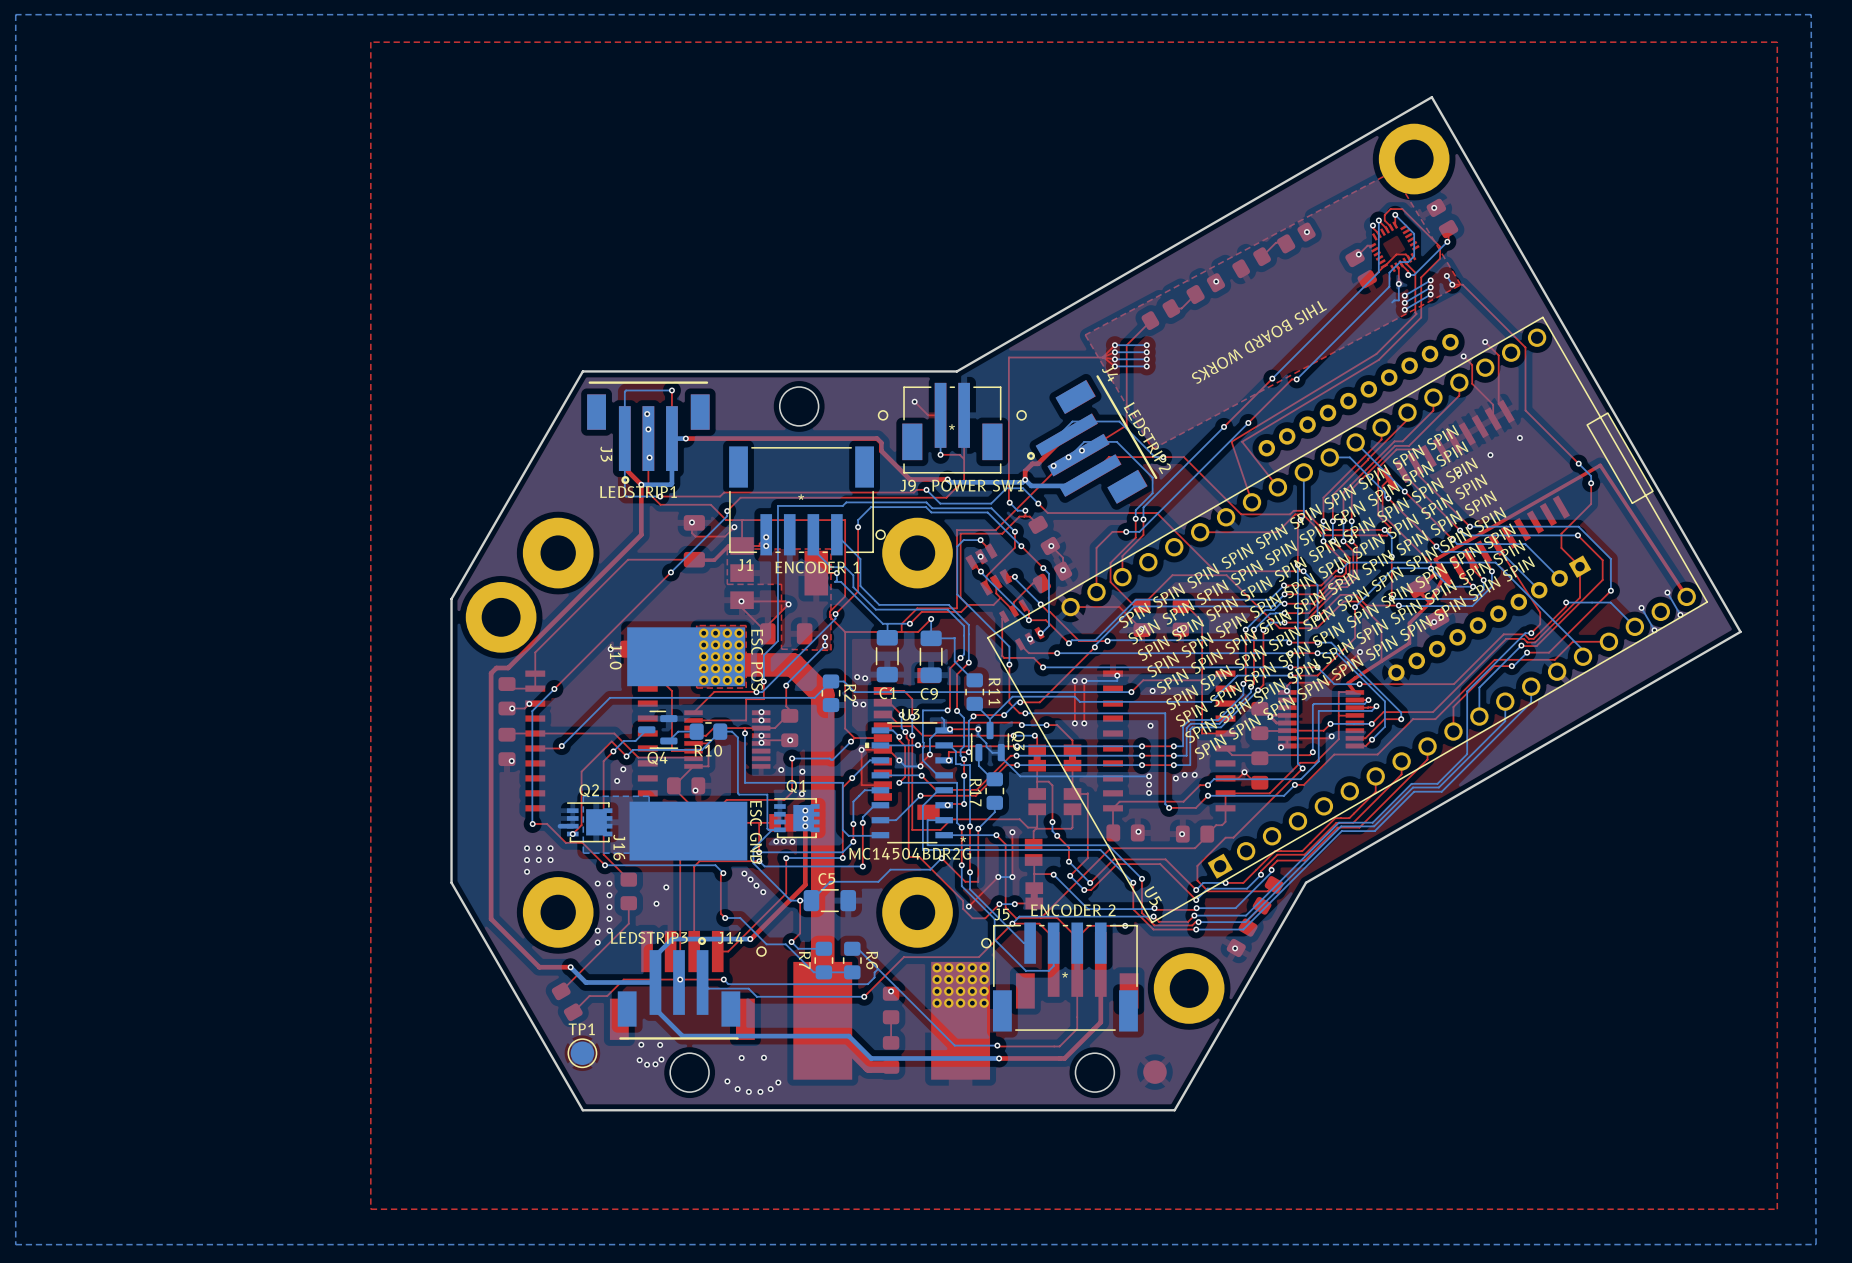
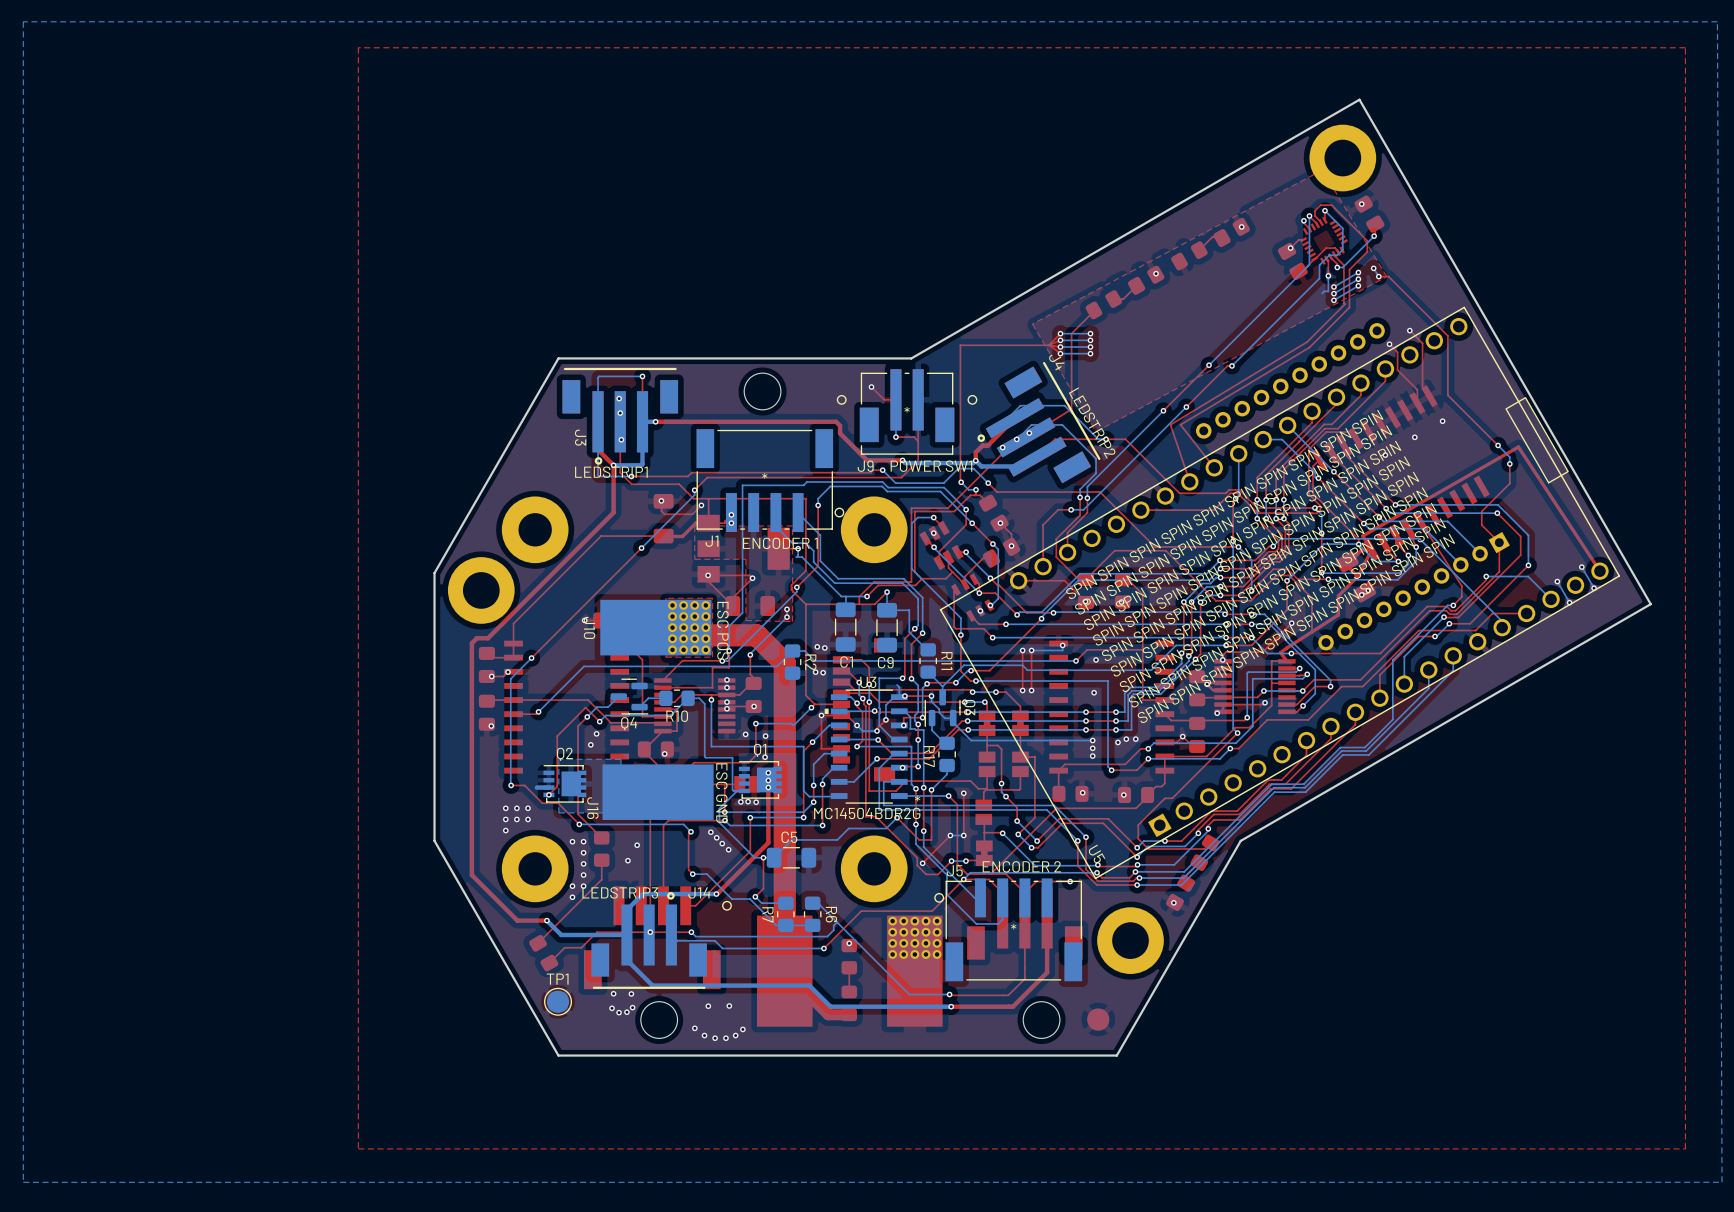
text: THIS BOARD WORKS (1259, 342) -> none

